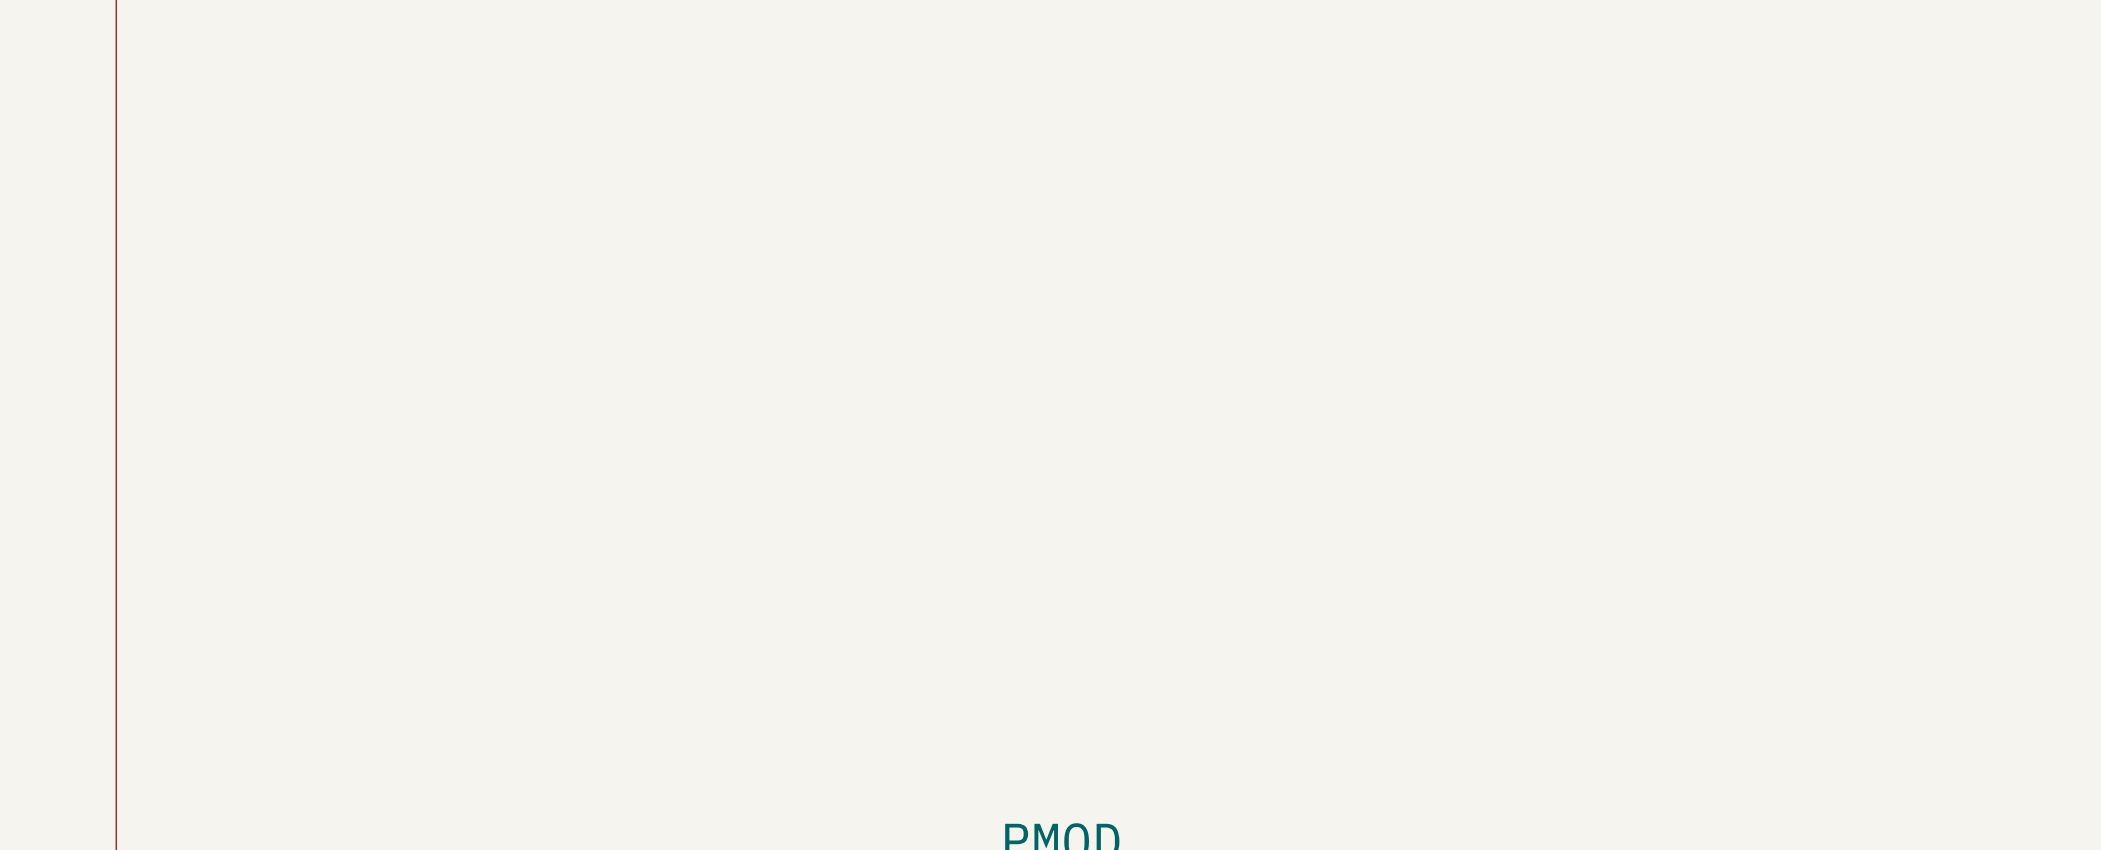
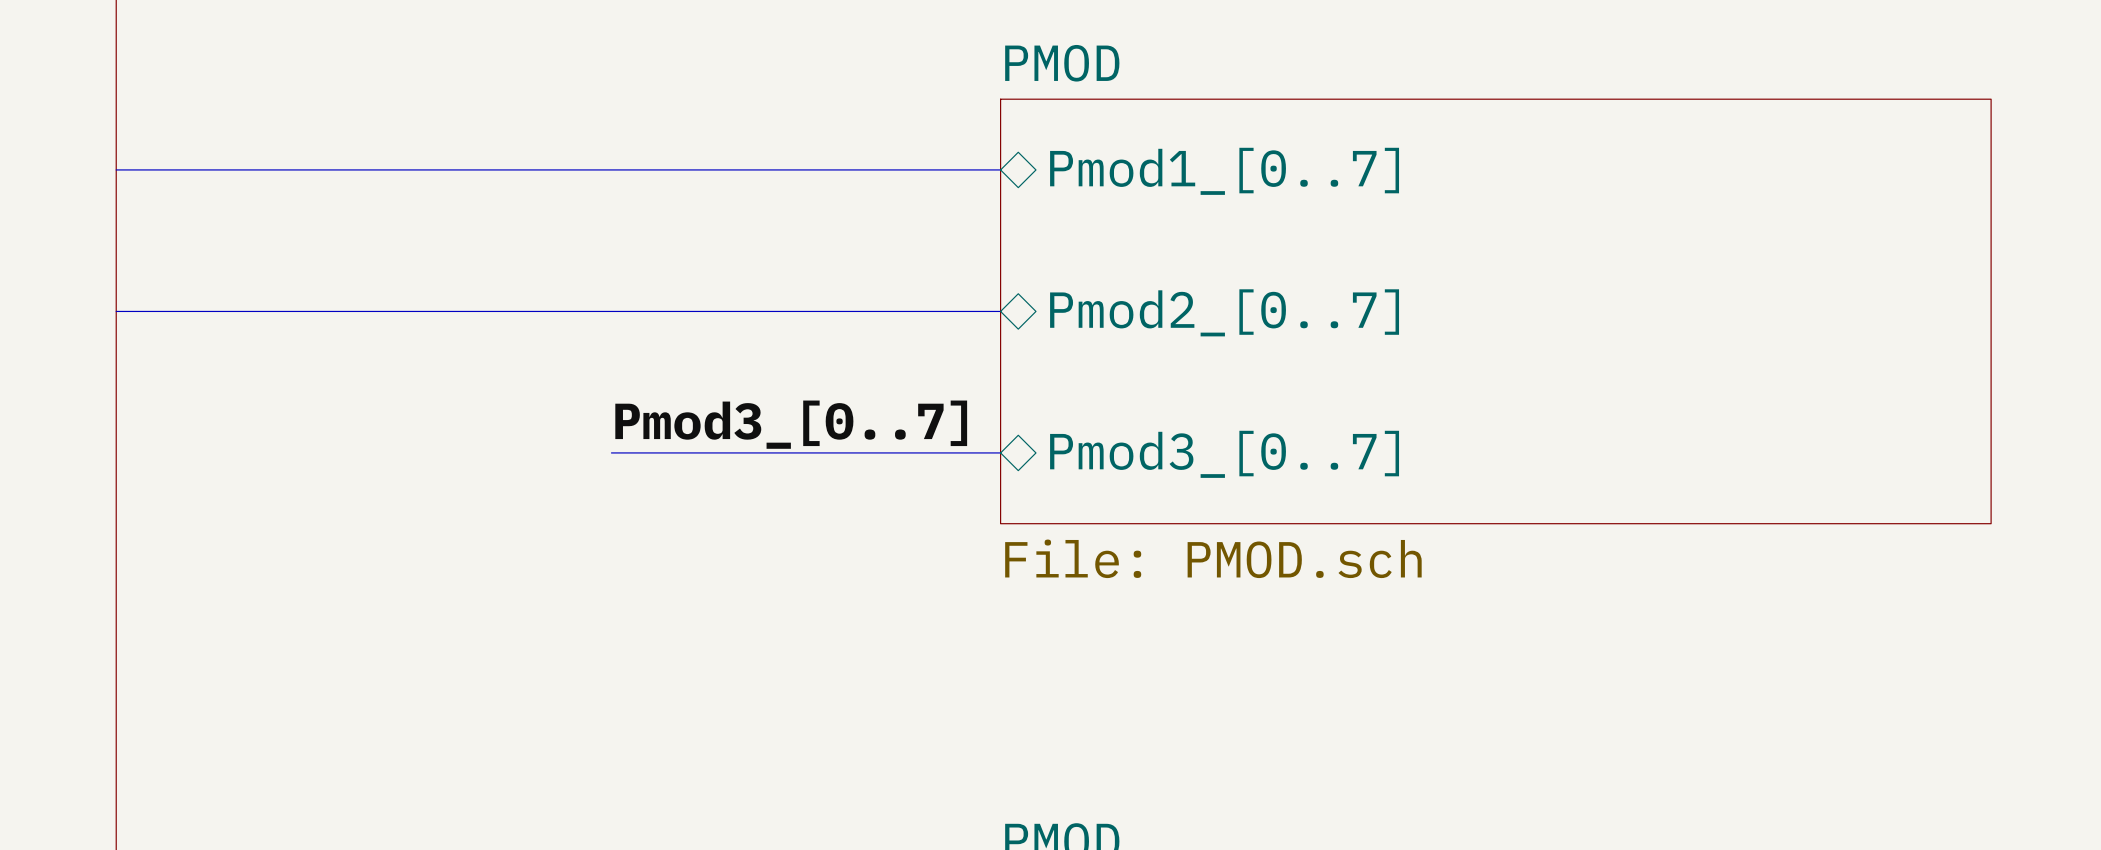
bus: none -> (116, 169) (1000, 169)
sheet pin: none -> Pmod1_[0..7] (1224, 171)
bus: none -> (116, 311) (1000, 311)
sheet PMOD: none -> File: PMOD.sch (1495, 311)
sheet pin: none -> Pmod2_[0..7] (1224, 312)
label: none -> Pmod3_[0..7] (791, 424)
bus: none -> (611, 452) (1000, 452)
sheet pin: none -> Pmod3_[0..7] (1224, 454)

